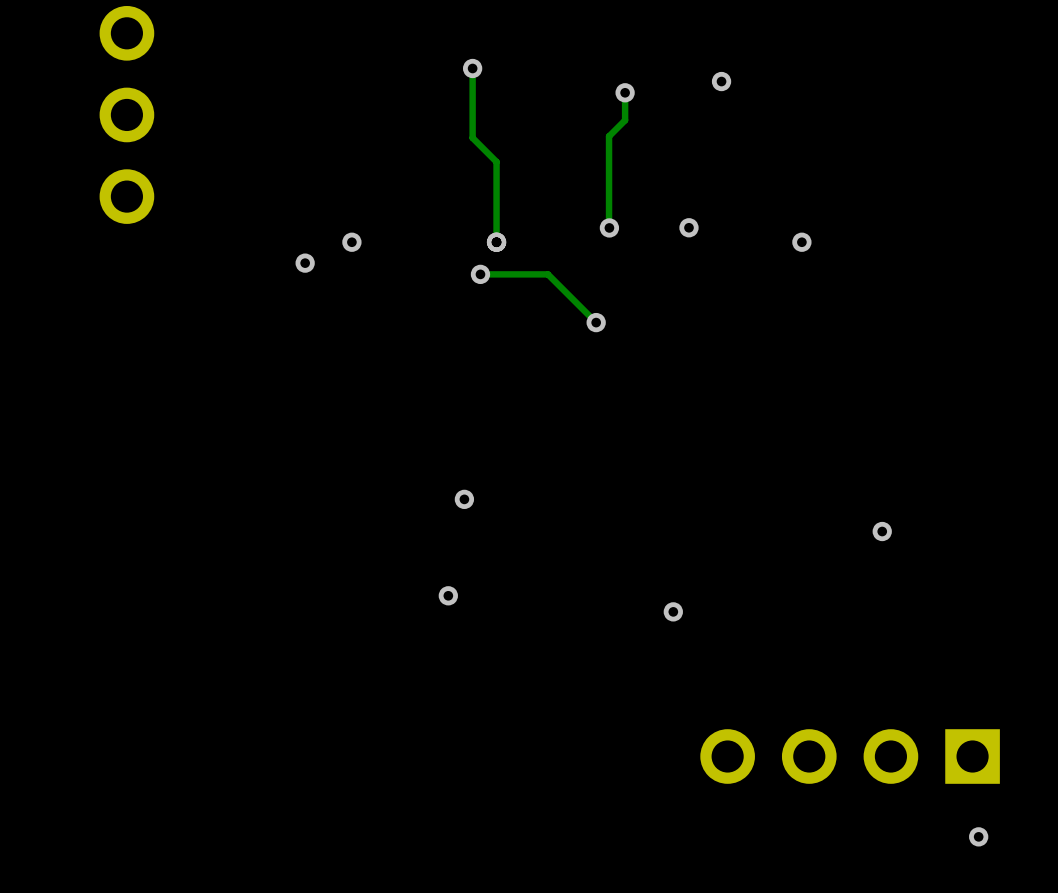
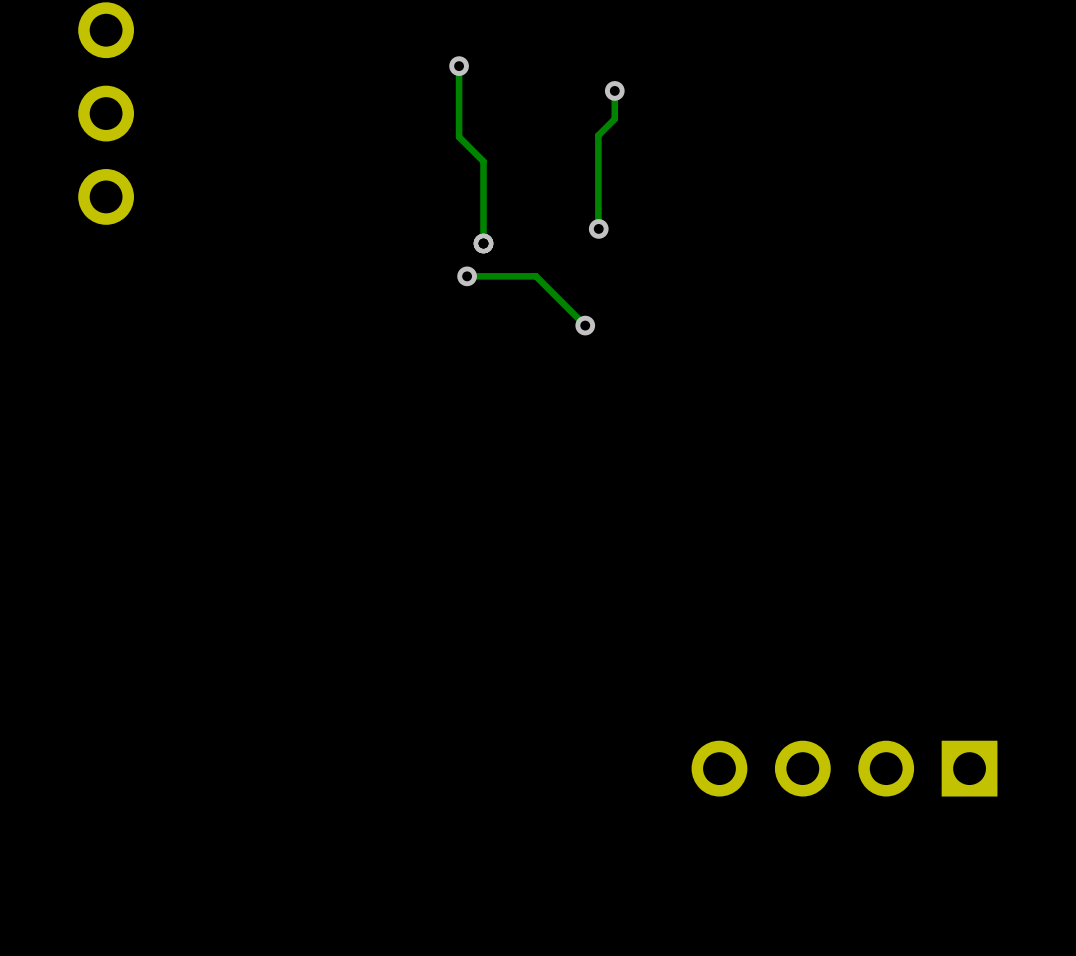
via: (721, 81) -> none
via: (688, 227) -> none
via: (351, 242) -> none
via: (801, 242) -> none
via: (305, 263) -> none
via: (464, 499) -> none
via: (882, 531) -> none
via: (448, 595) -> none
via: (673, 611) -> none
via: (978, 836) -> none

